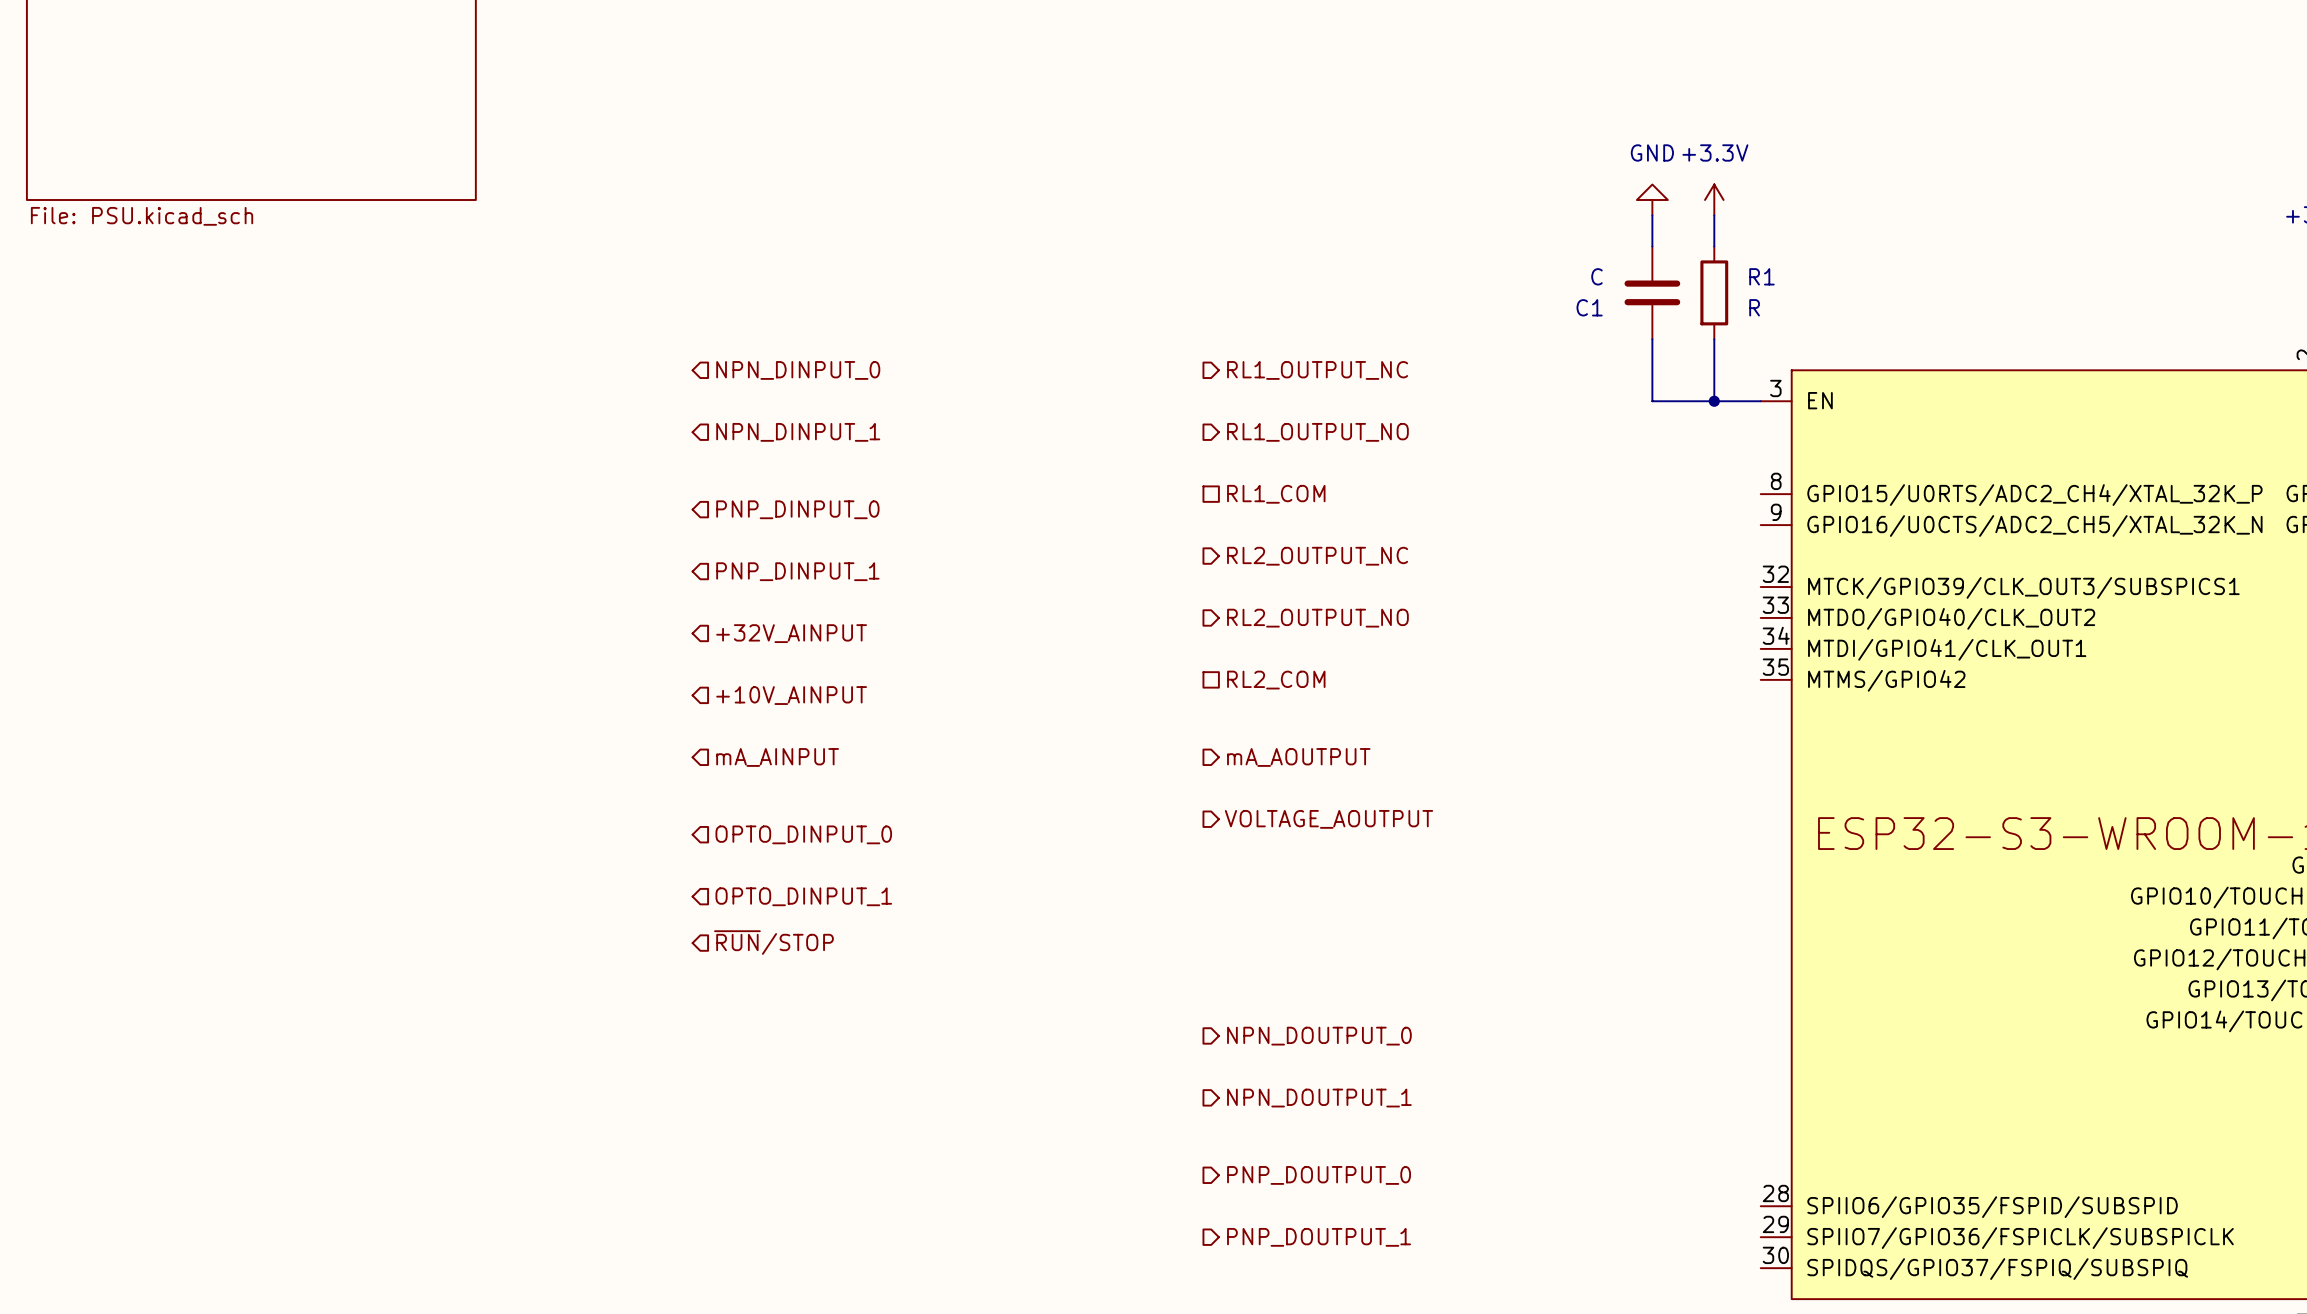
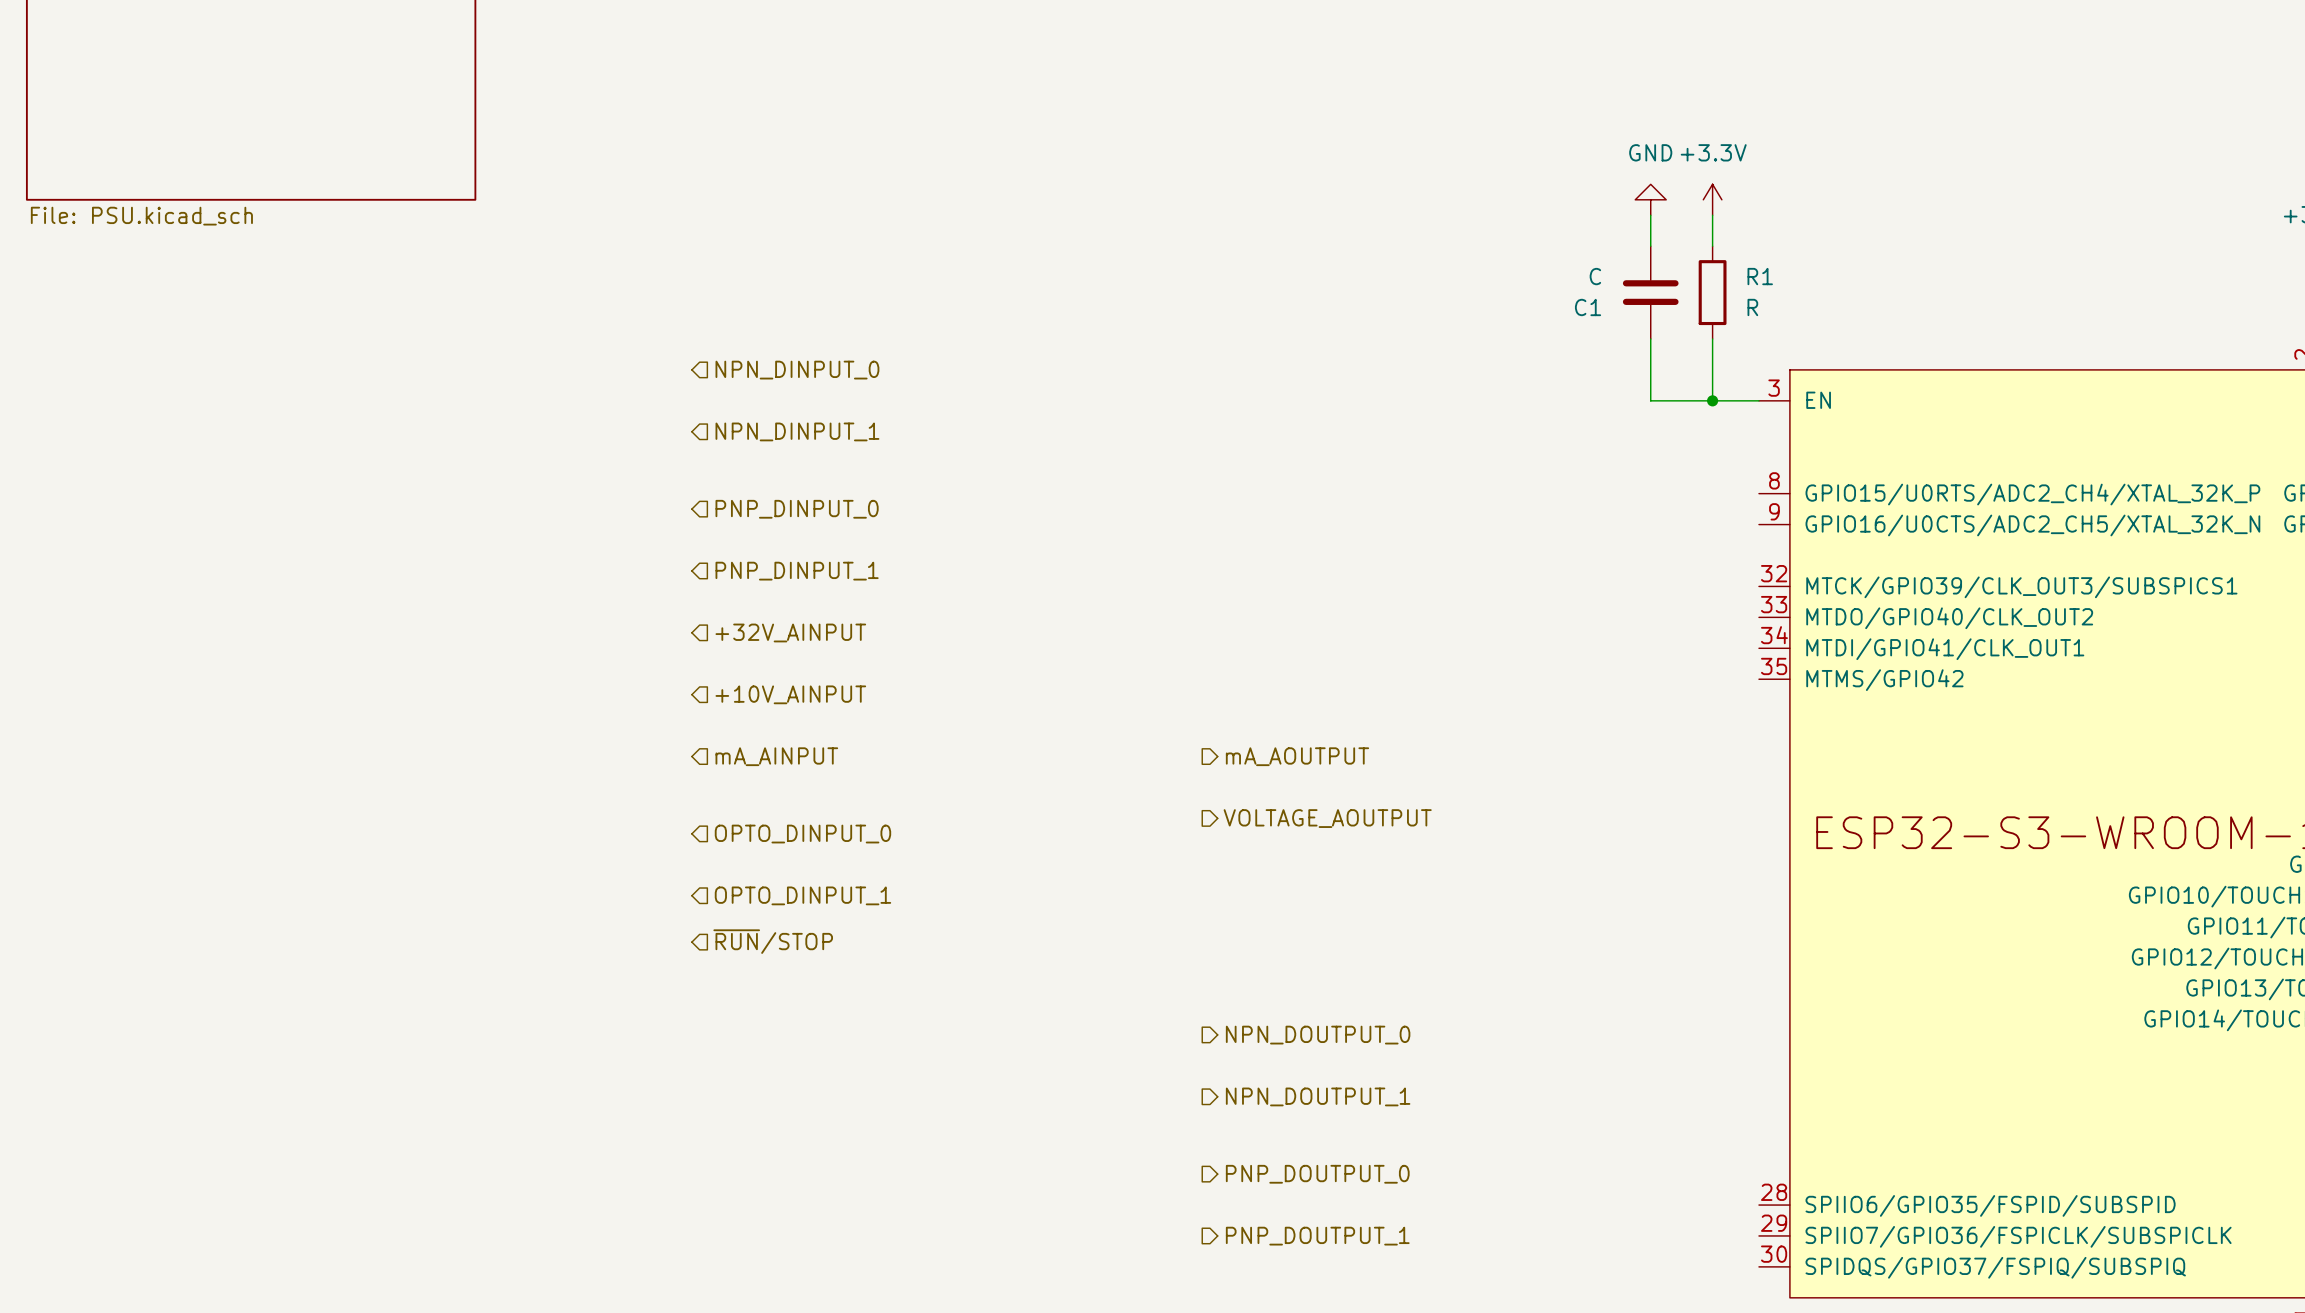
hierarchical label: RL1_OUTPUT_NC (1317, 370) -> none
hierarchical label: RL1_OUTPUT_NO (1317, 432) -> none
hierarchical label: RL1_COM (1276, 494) -> none
hierarchical label: RL2_OUTPUT_NC (1317, 556) -> none
hierarchical label: RL2_OUTPUT_NO (1317, 618) -> none
hierarchical label: RL2_COM (1276, 680) -> none

